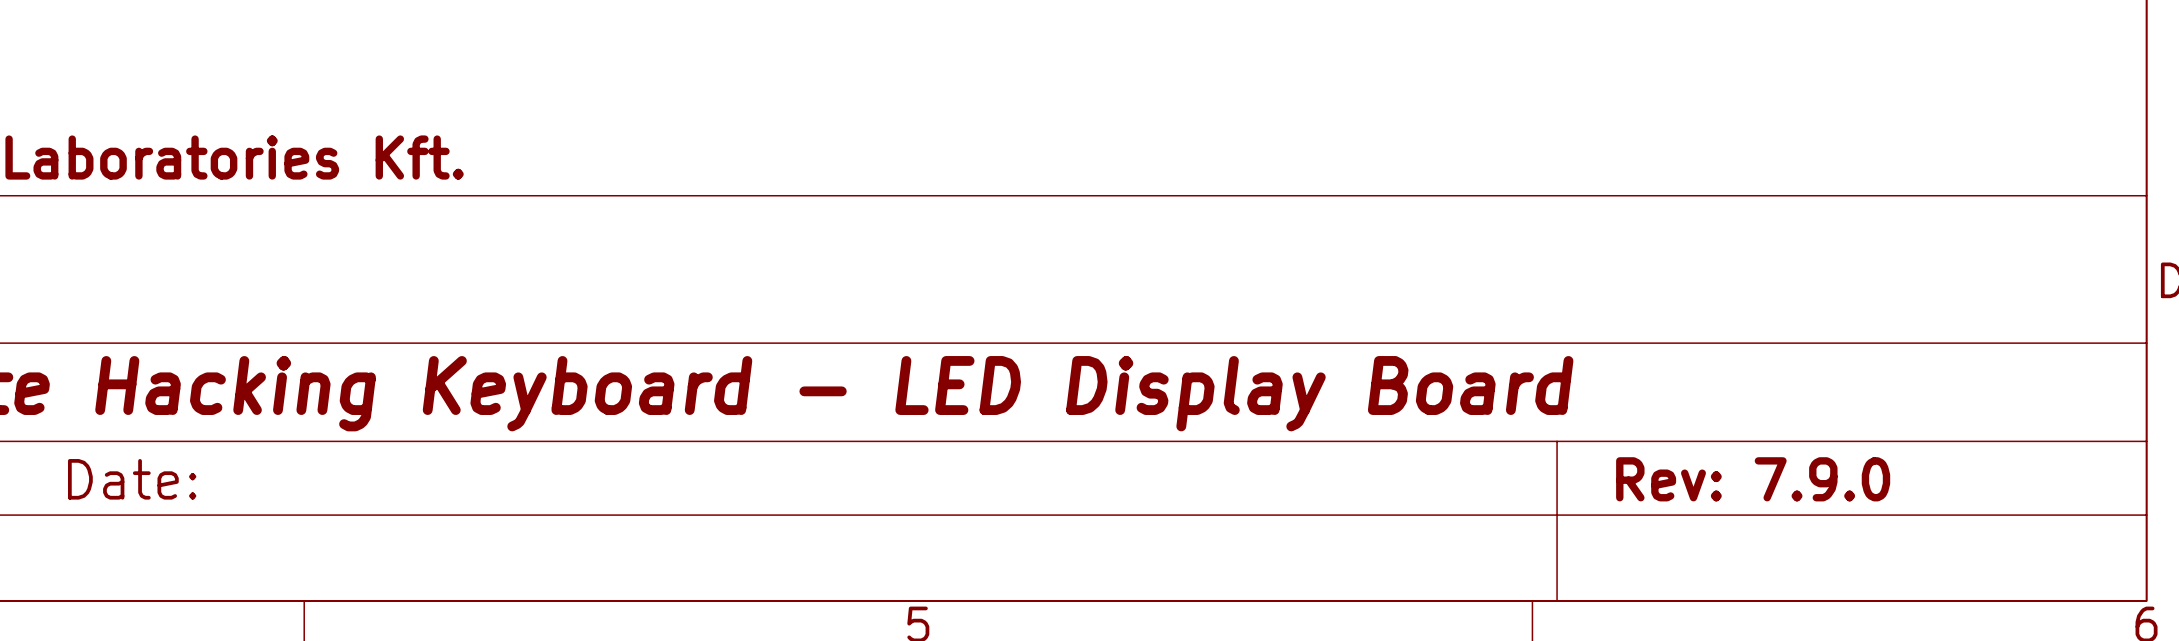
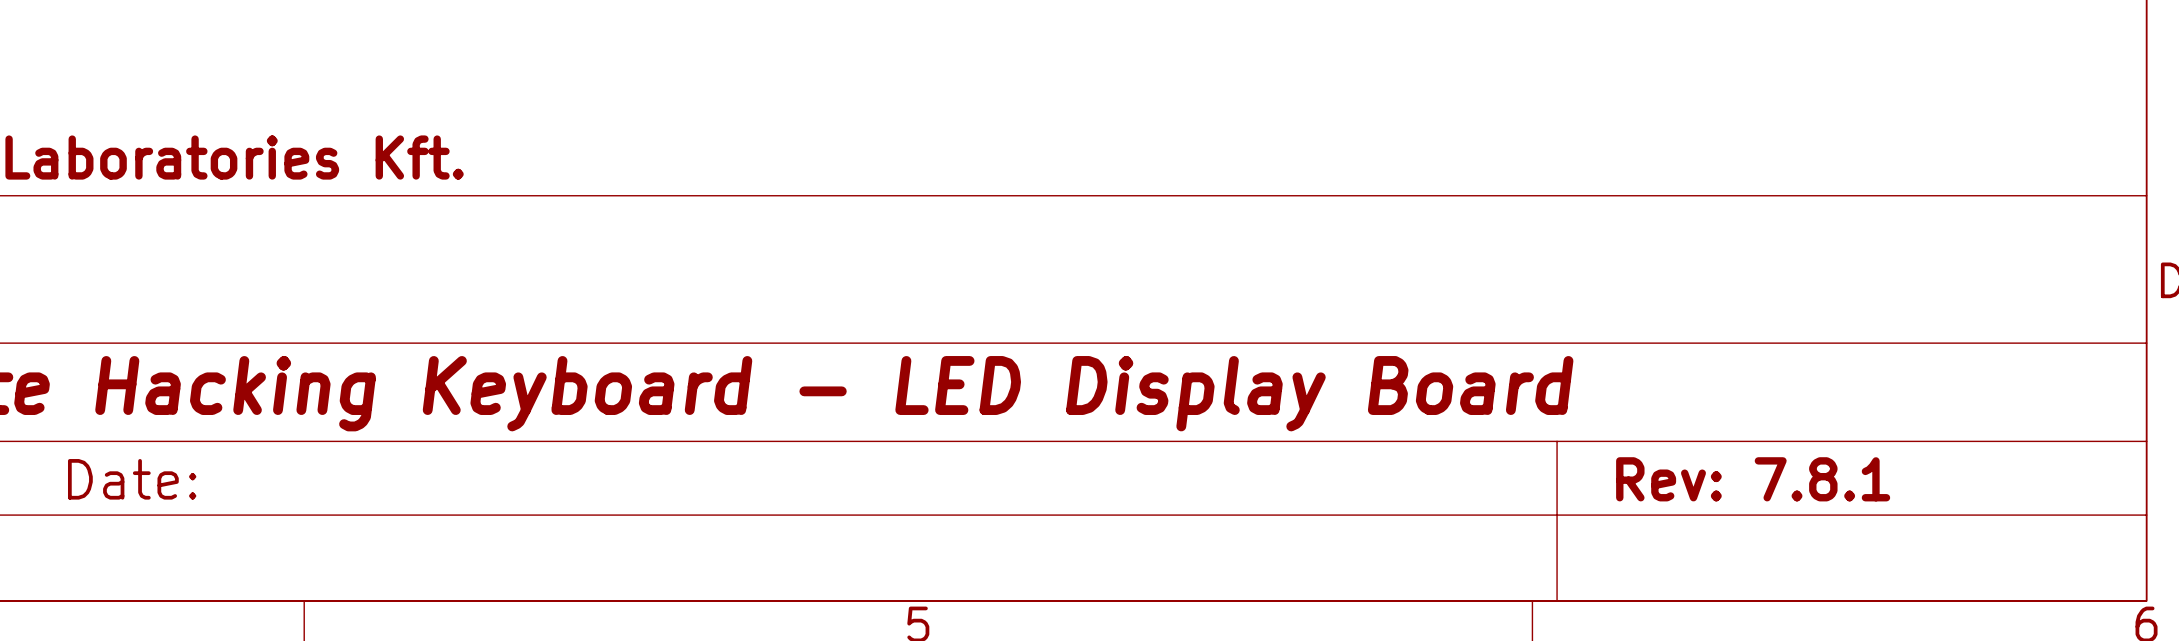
title block: Rev: 7.9.0 (1753, 479) -> Rev: 7.8.1 (1753, 479)

